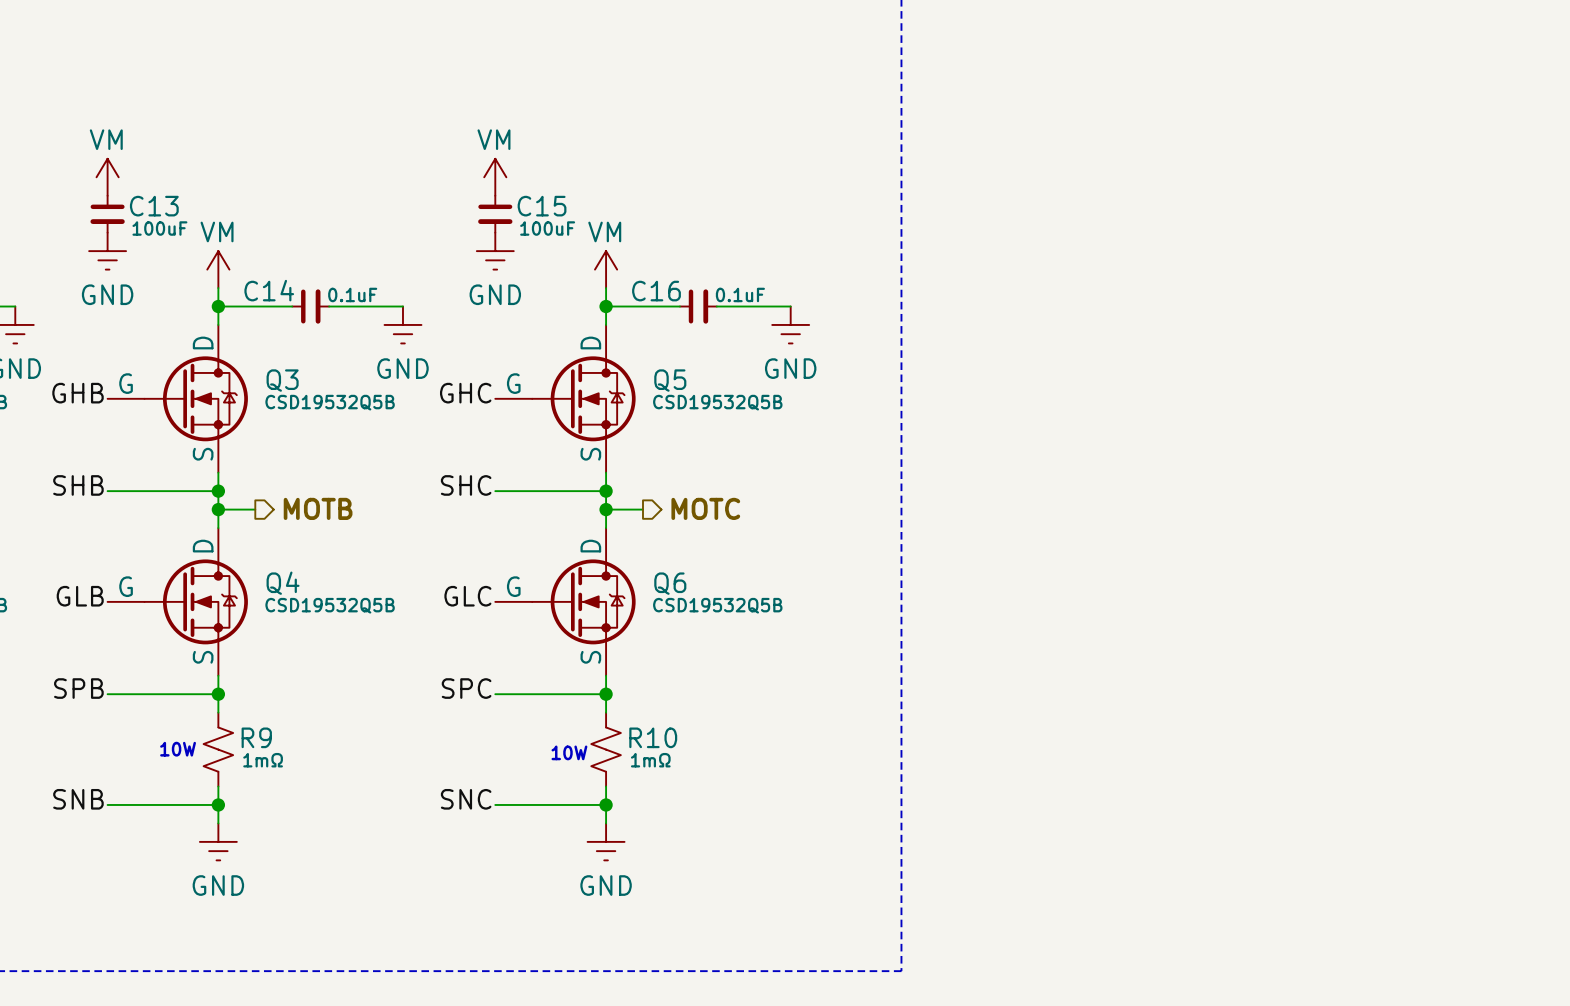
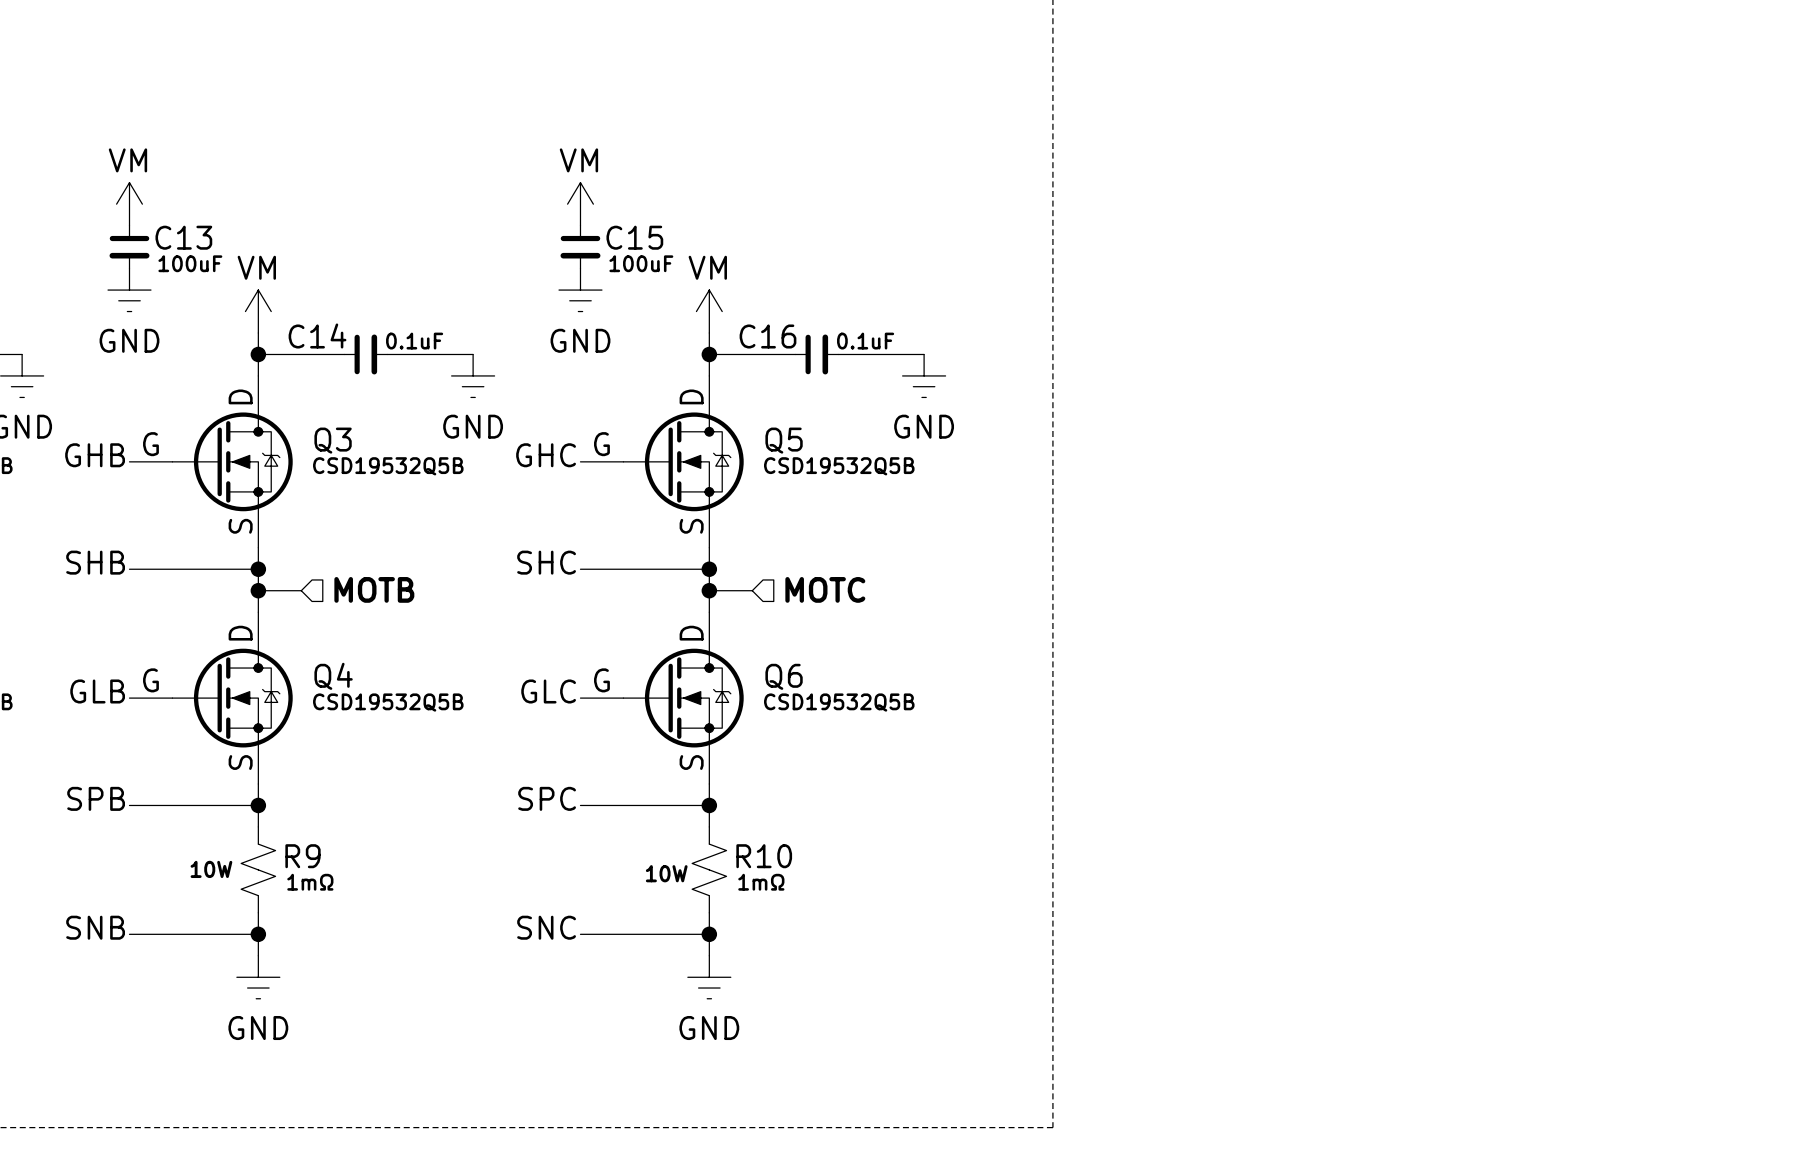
hierarchical label shape: output (318, 508) -> input (374, 589)
hierarchical label shape: output (705, 508) -> input (825, 589)

